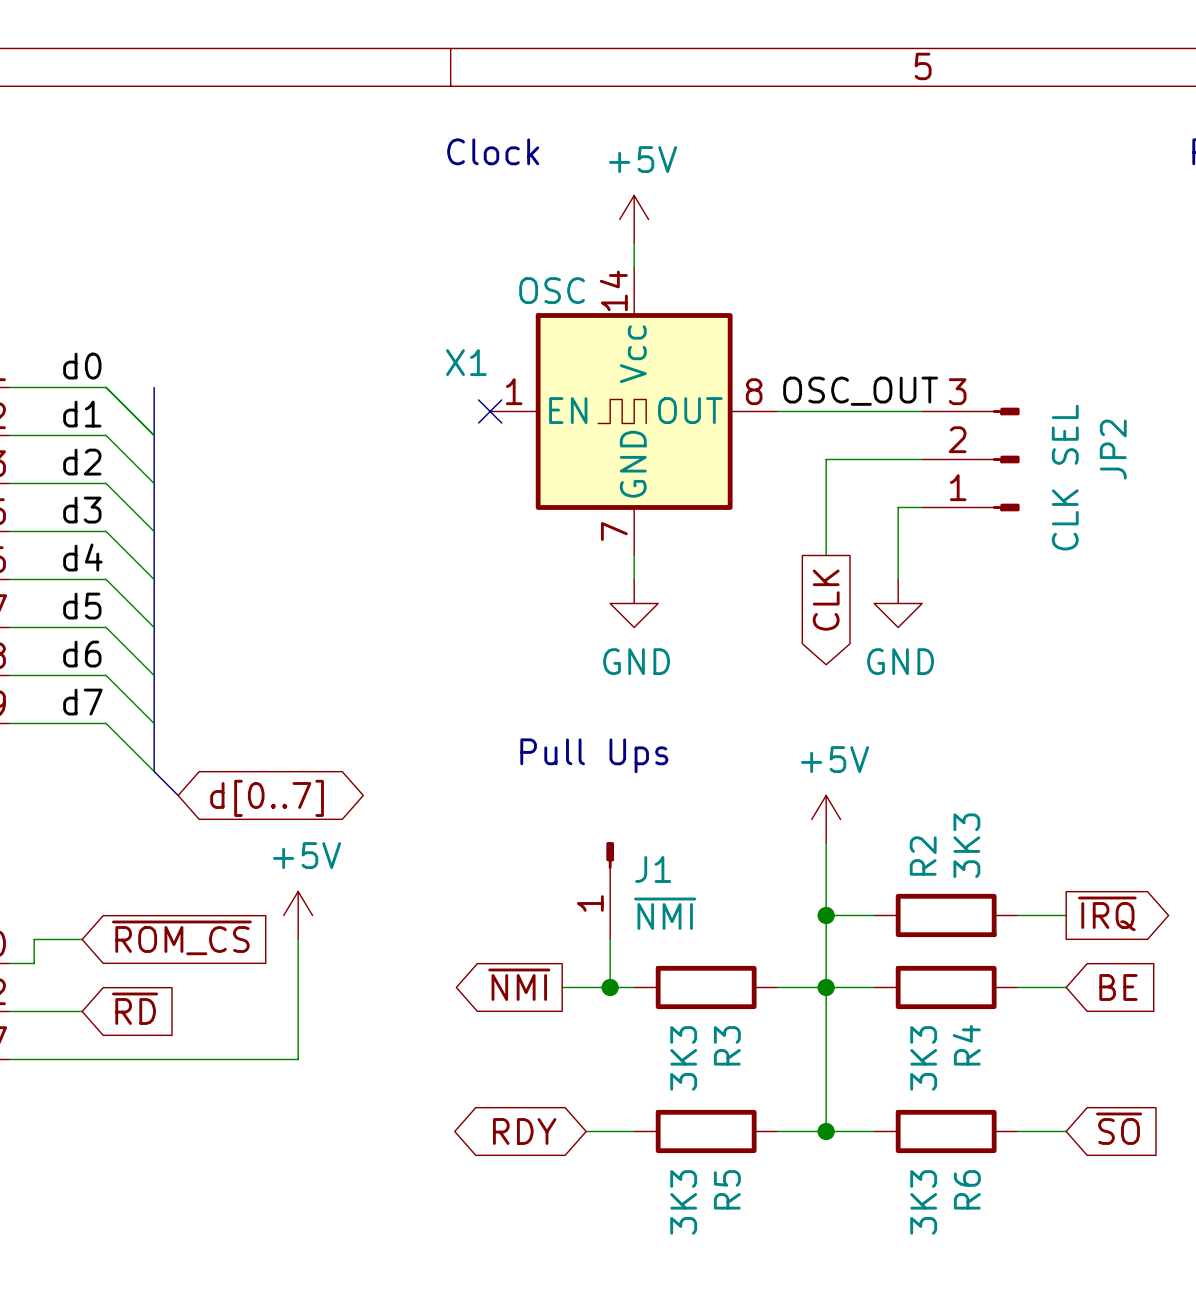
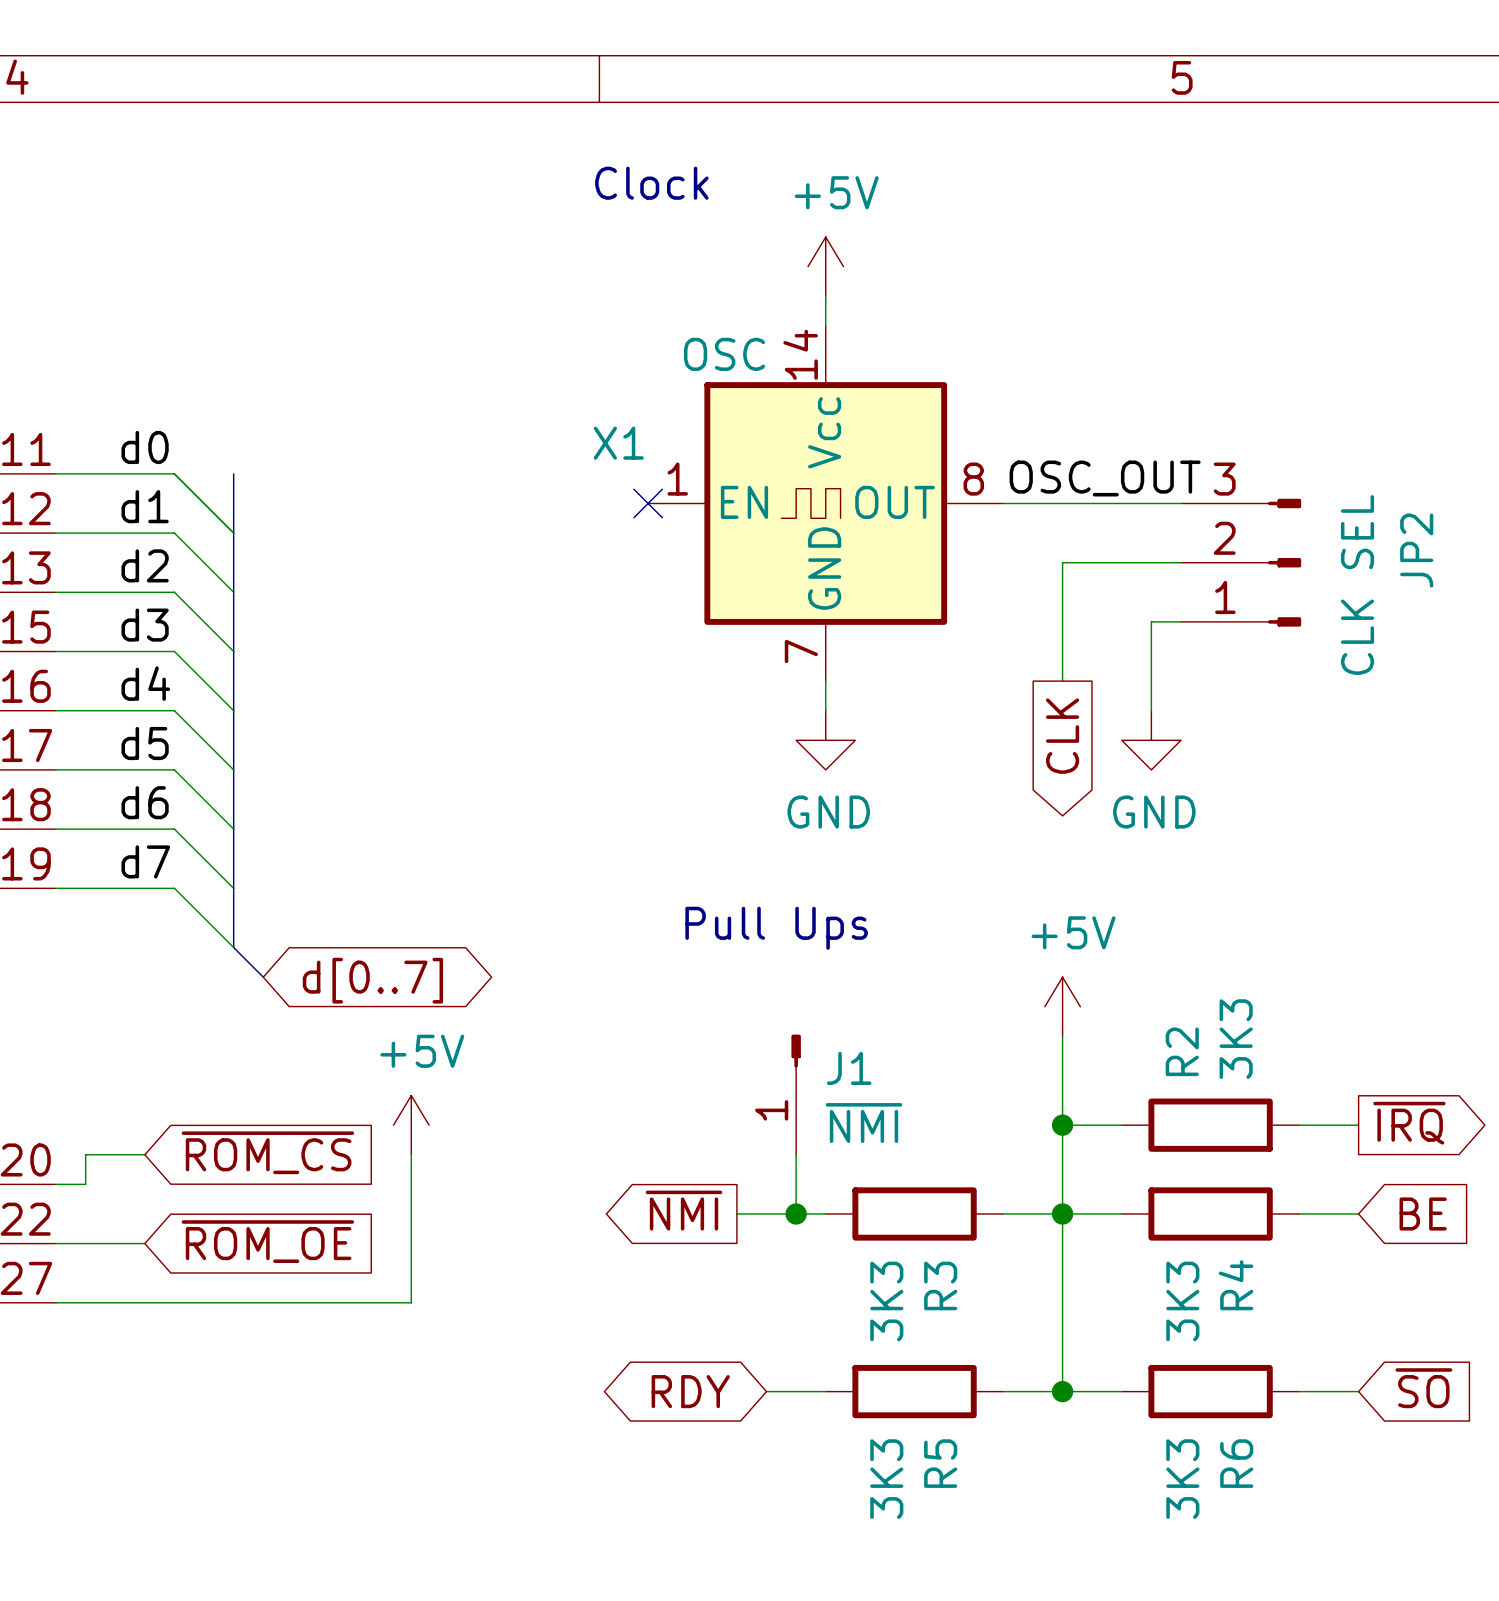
global label: ~{RD} (135, 1008) -> ~{ROM_OE} (267, 1241)

